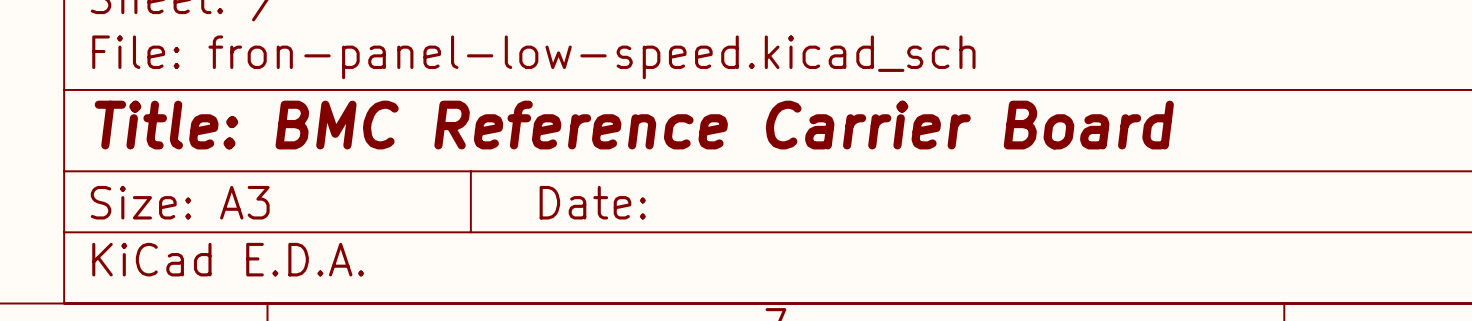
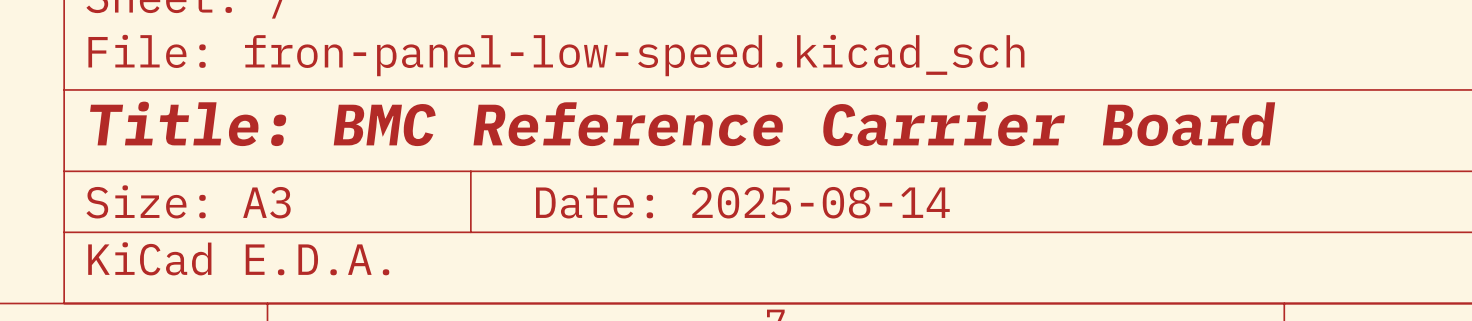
title block: Date: (592, 202) -> Date: 2025-08-14 (742, 202)

